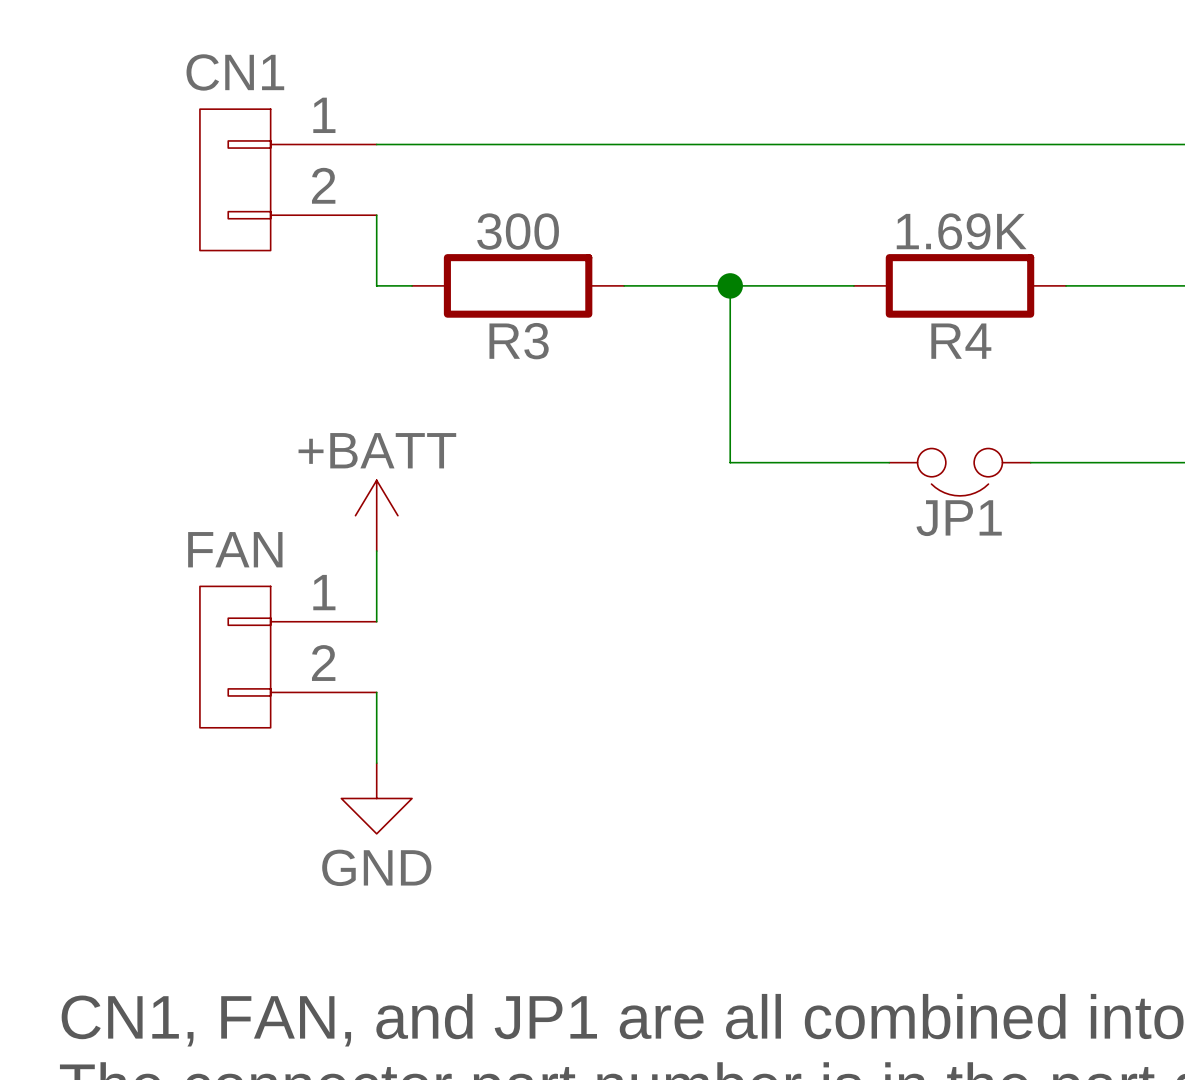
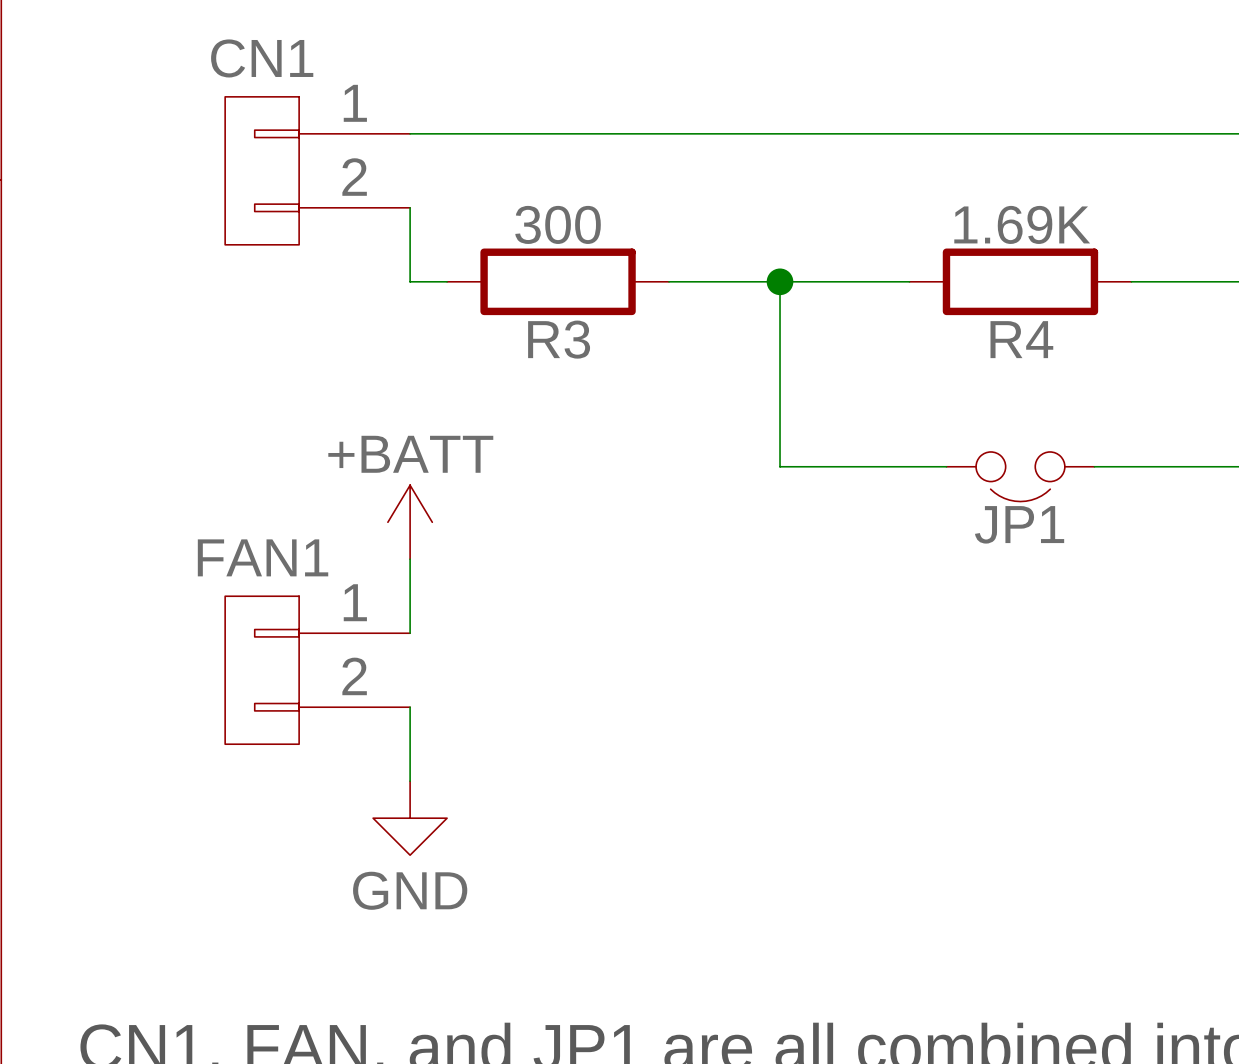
FAN name: FAN (235, 549) -> FAN1 (263, 557)

